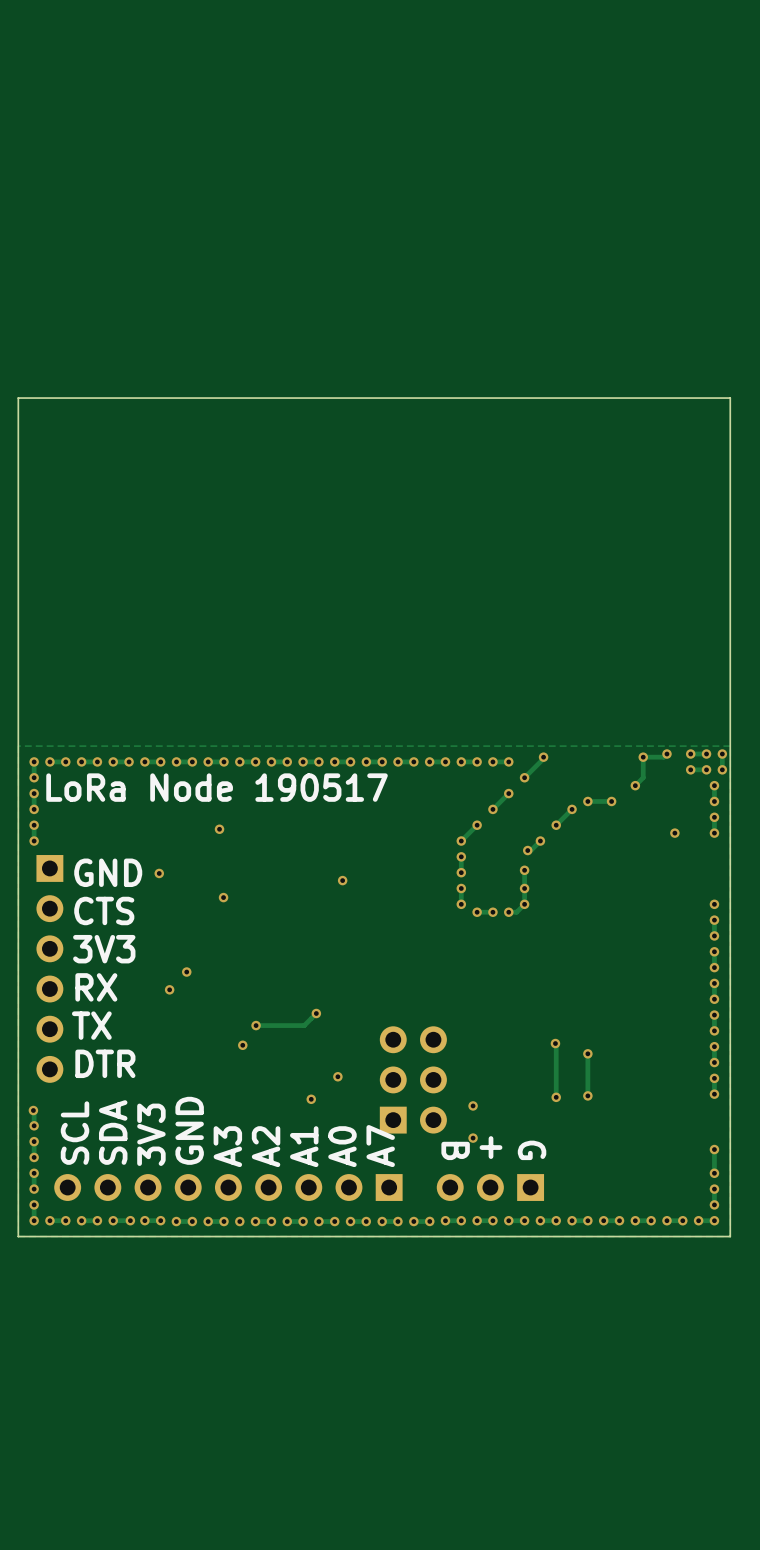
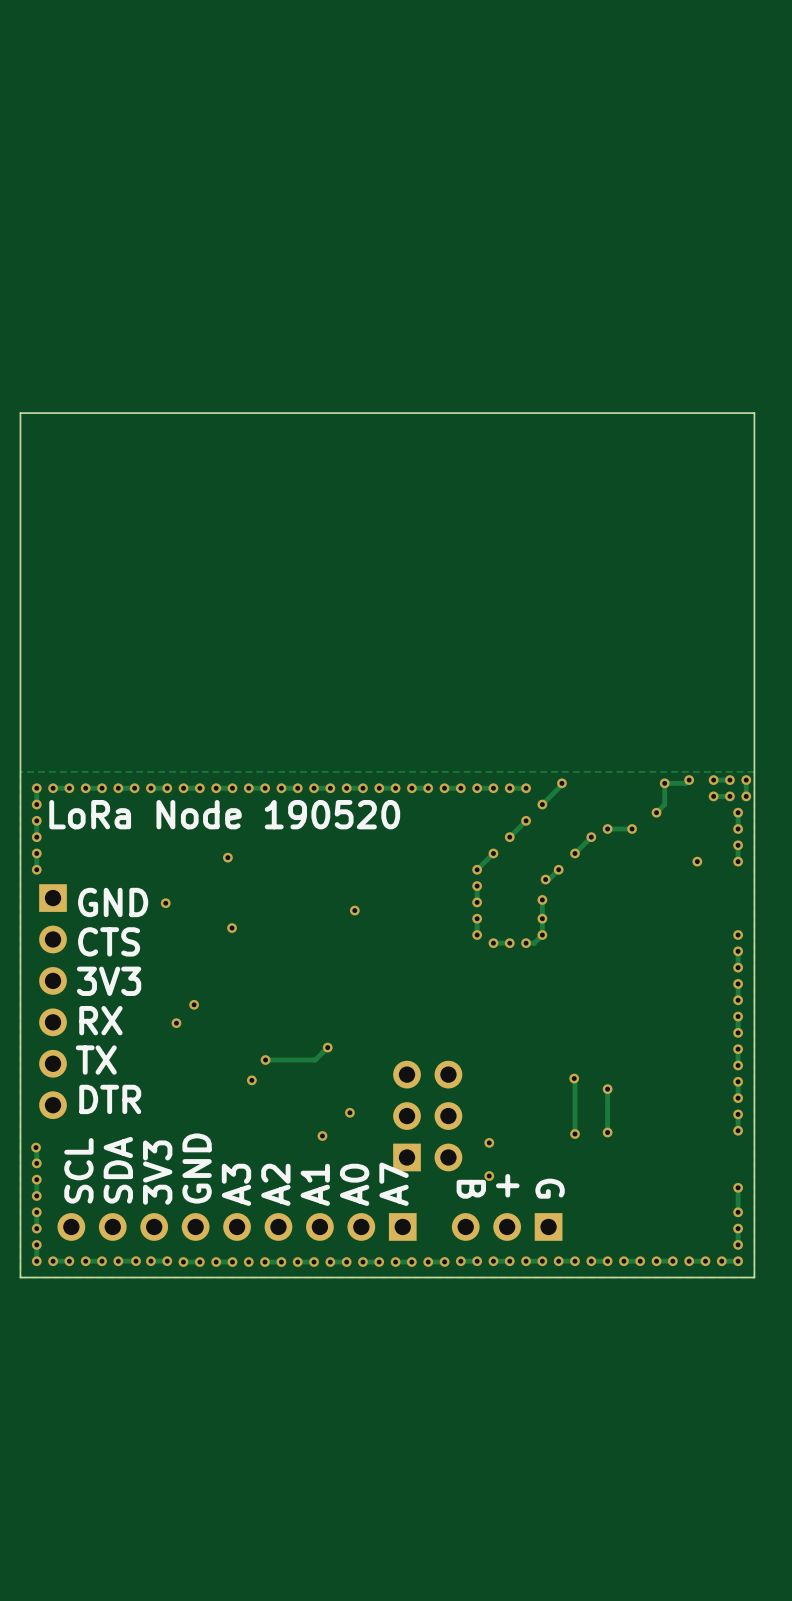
text: LoRa Node 190517 (217, 787) -> LoRa Node 190520 (224, 814)

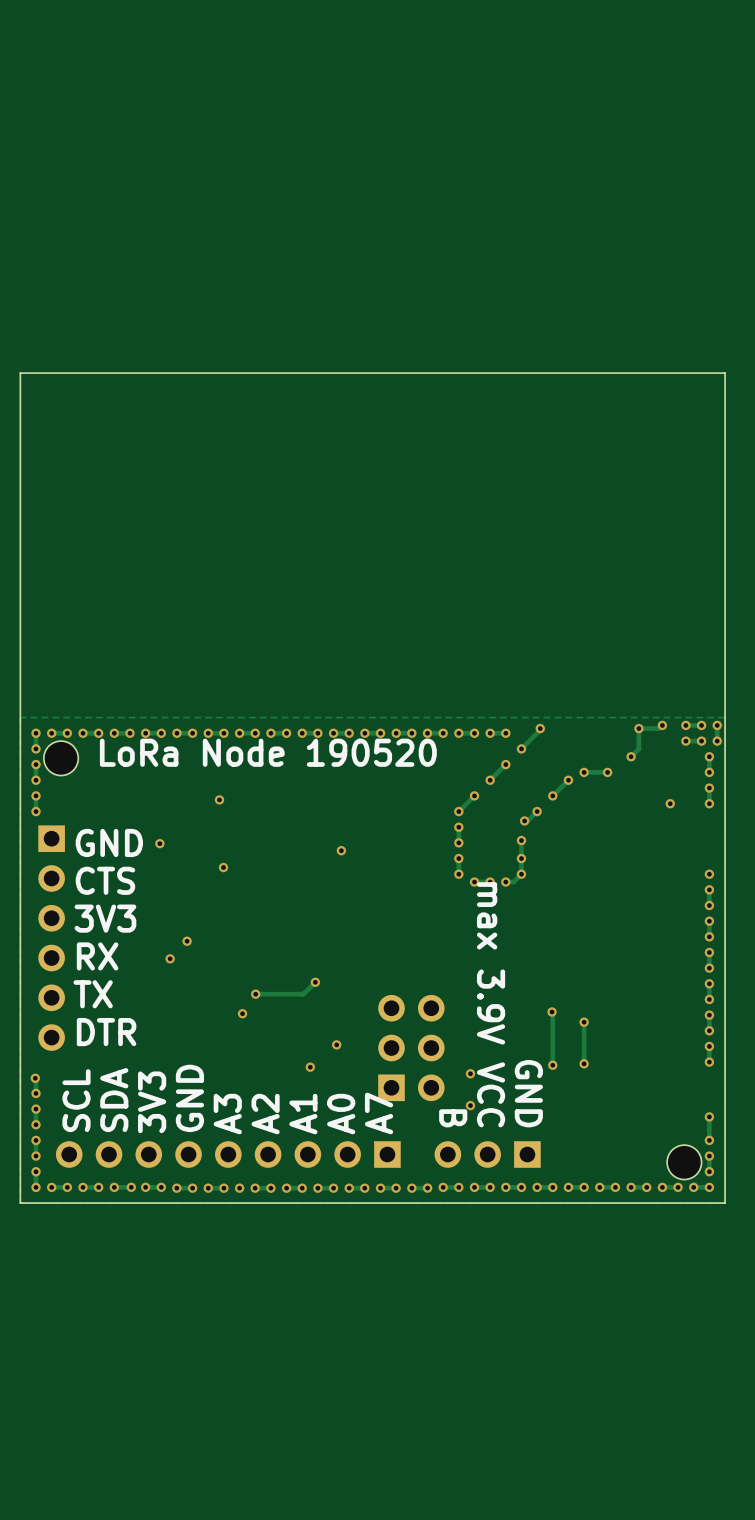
part: none -> (61, 758)
text position: LoRa Node 190520 (224, 814) -> LoRa Node 190520 (268, 752)
text: + (507, 1185) -> max 3.9V VCC (491, 1004)
text: G (550, 1188) -> GND (528, 1093)
part: none -> (684, 1162)

